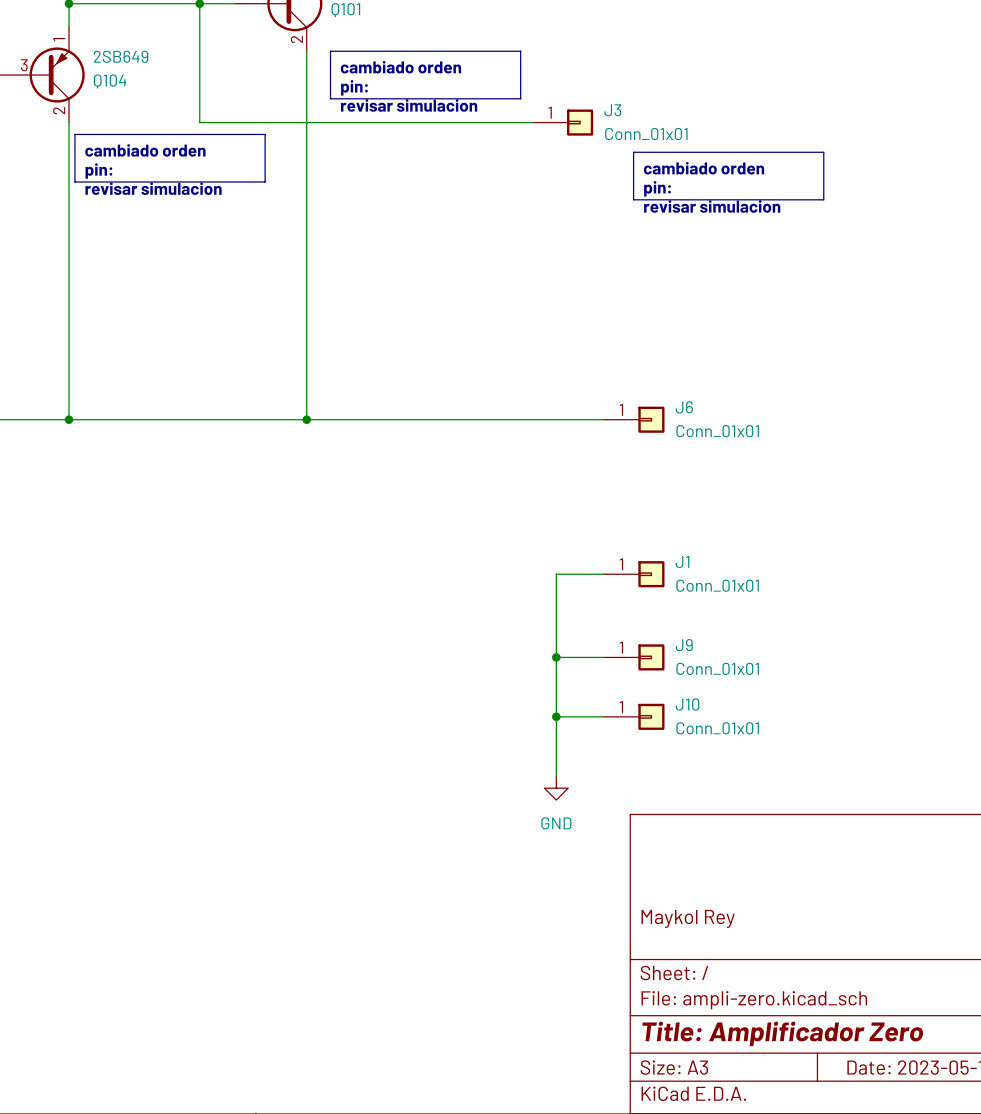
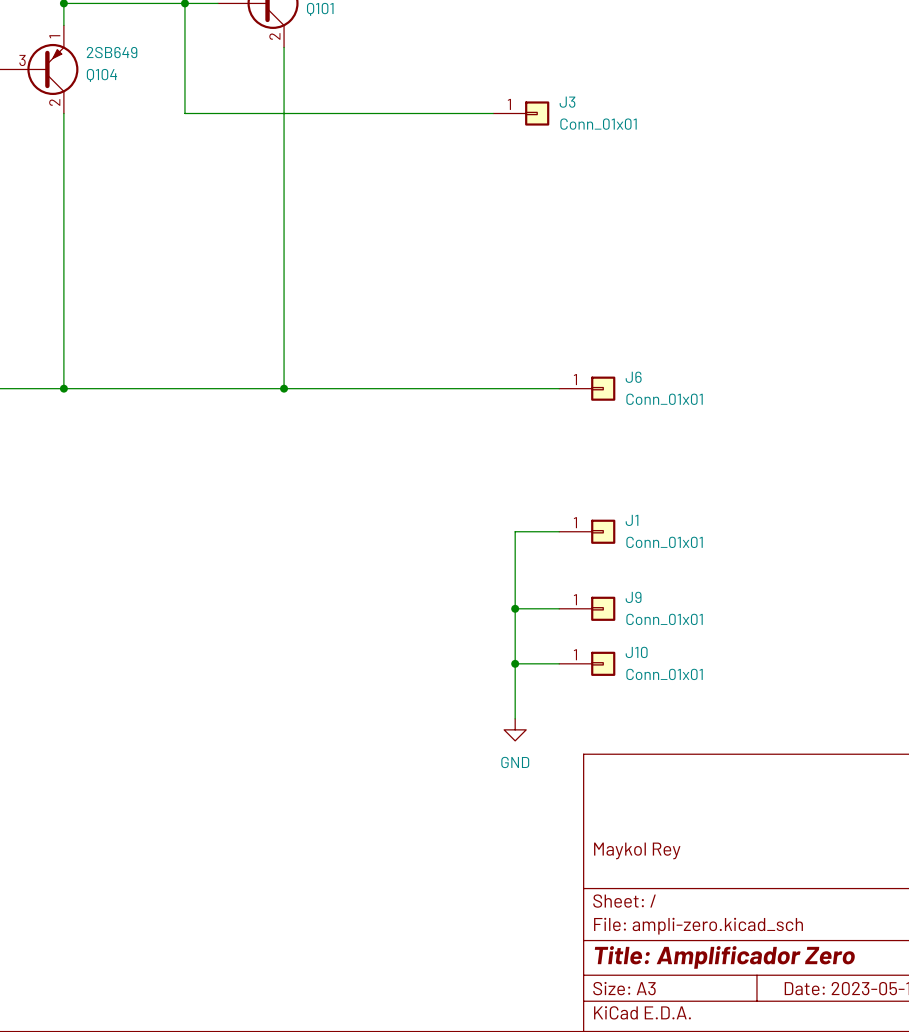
line: (330, 51) (520, 51) (520, 98) (330, 98) (330, 51) -> none
text: cambiado orden (400, 67) -> none
text: pin: (354, 87) -> none
text: revisar simulacion (409, 105) -> none
line: (74, 134) (265, 134) (265, 181) (74, 181) (74, 134) -> none
text: cambiado orden (145, 150) -> none
line: (633, 152) (823, 152) (823, 199) (633, 199) (633, 152) -> none
text: cambiado orden (704, 168) -> none
text: pin: (98, 171) -> none
text: revisar simulacion (153, 188) -> none
text: pin: (657, 188) -> none
text: revisar simulacion (712, 206) -> none

